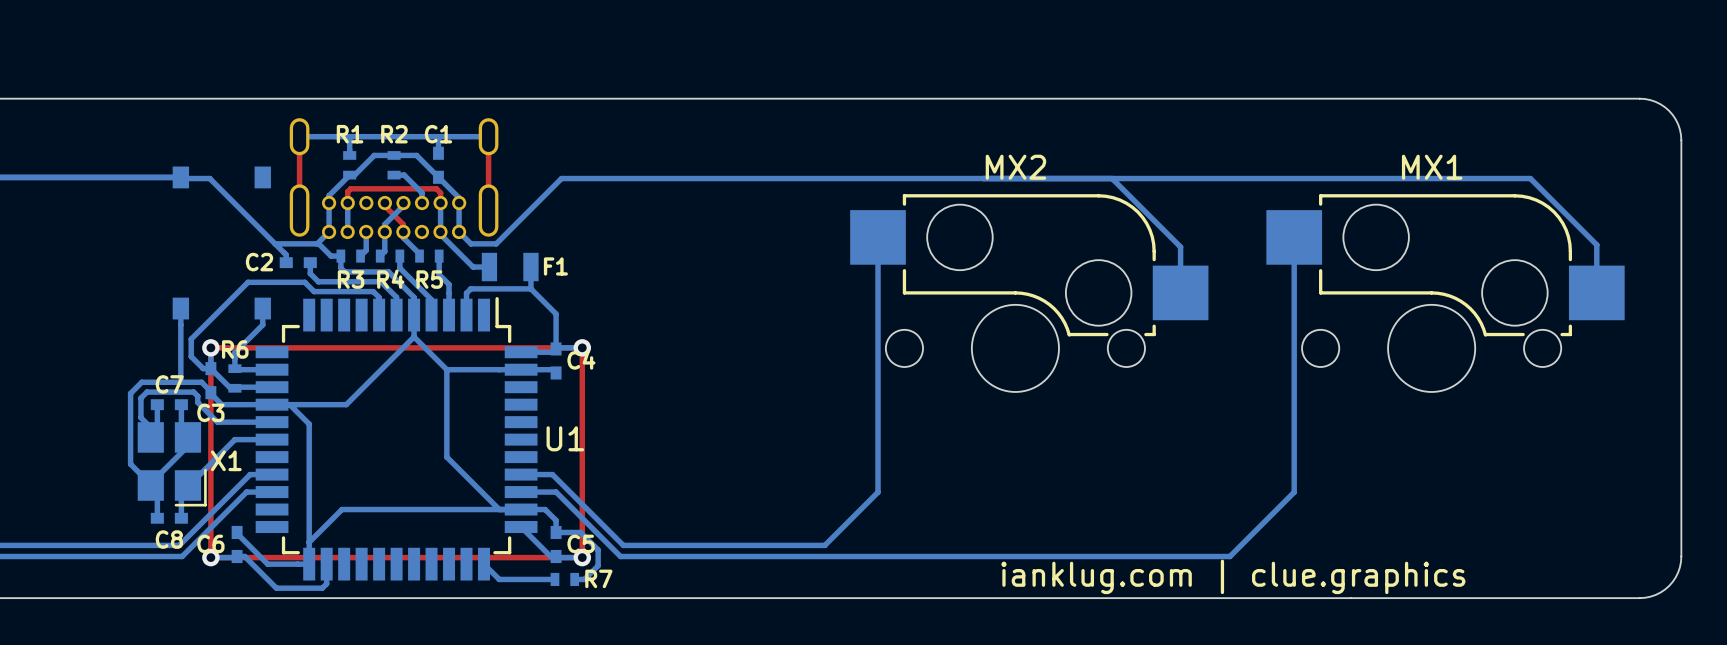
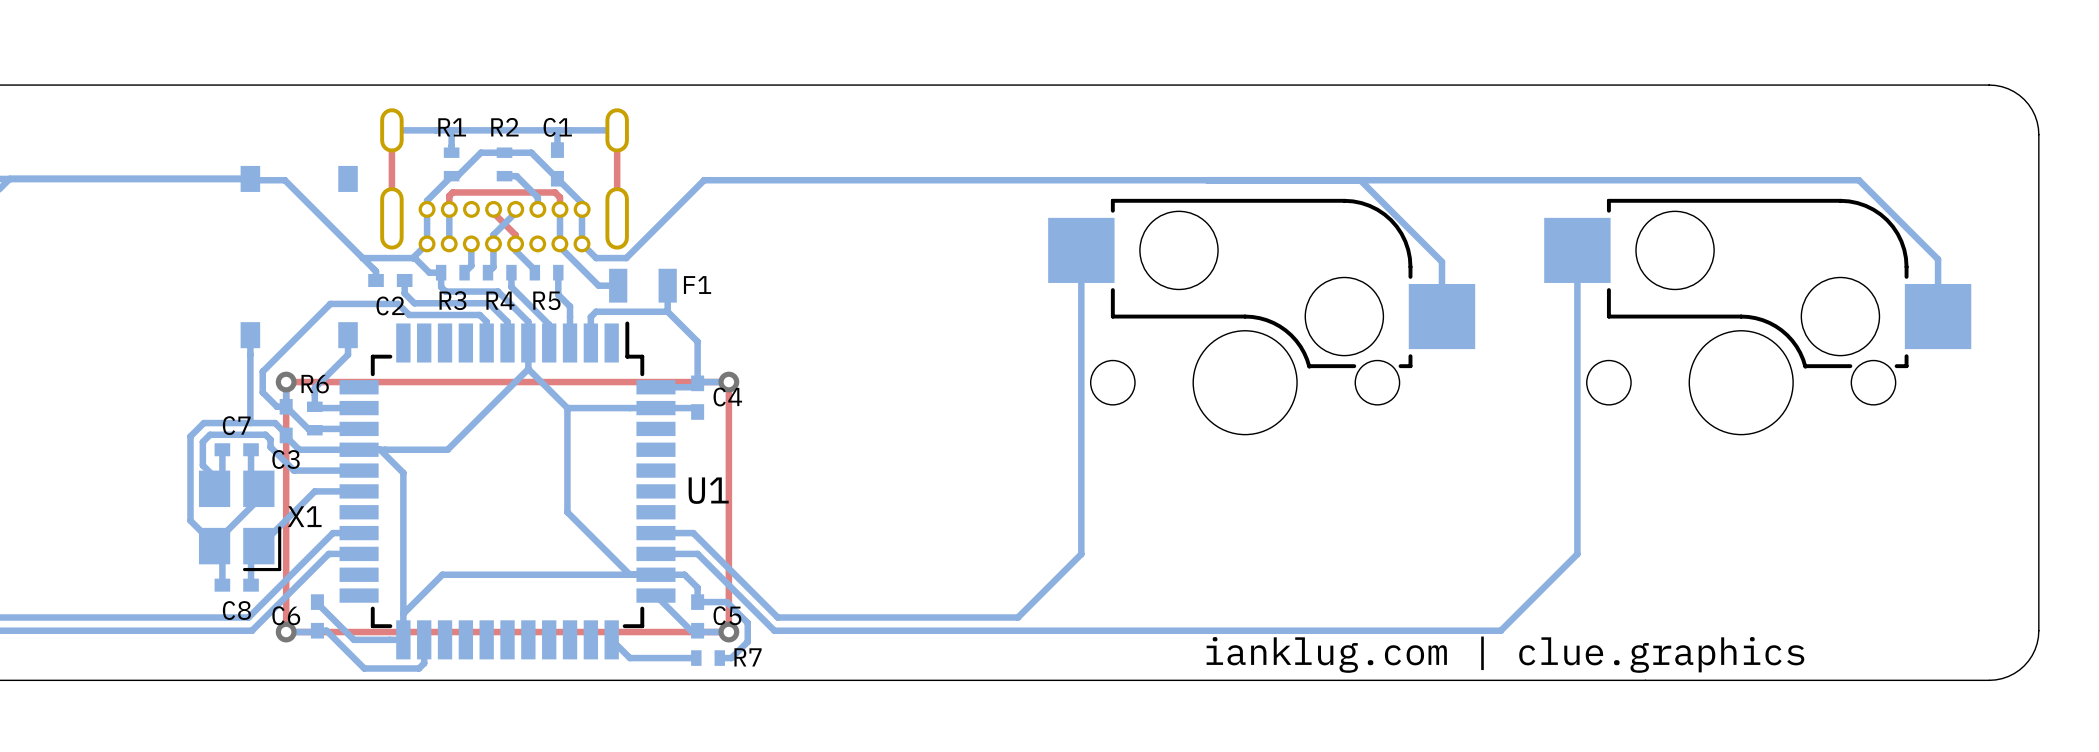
MX2 name: MX2 (1015, 167) -> none
MX1 name: MX1 (1432, 167) -> none
C2 name position: C2 (259, 262) -> C2 (390, 305)

